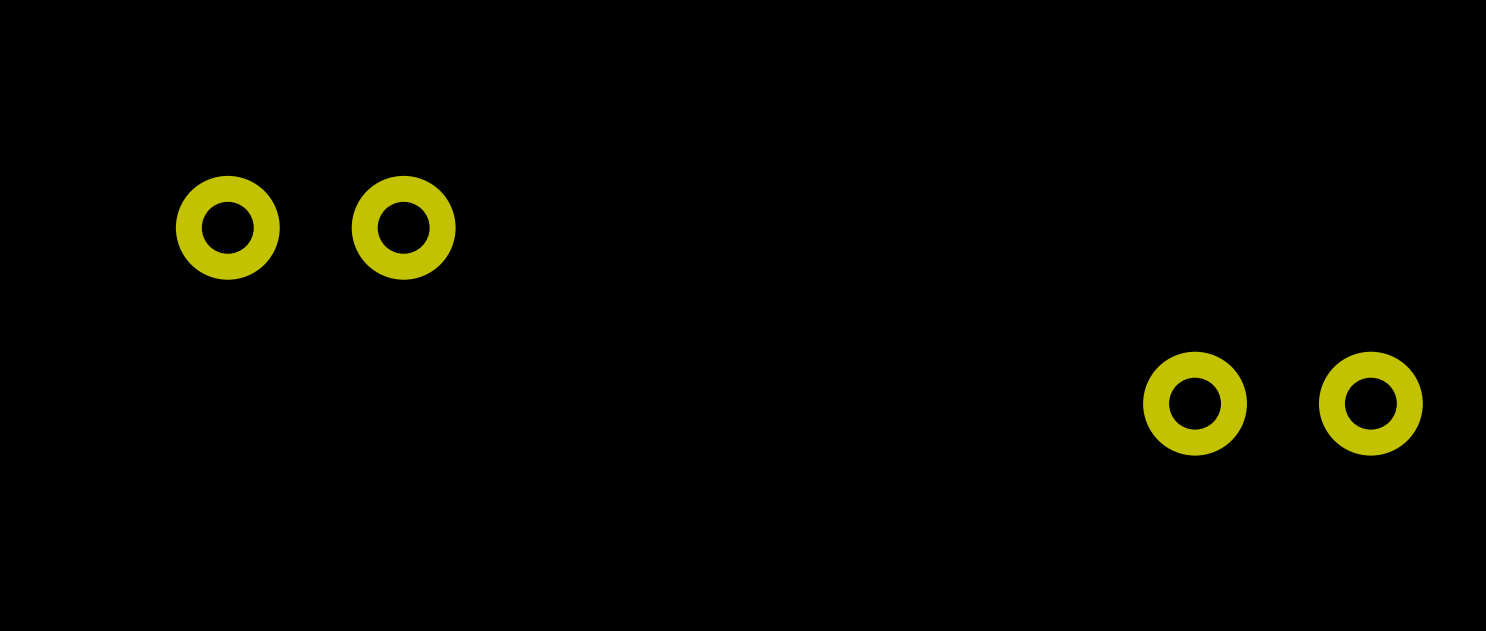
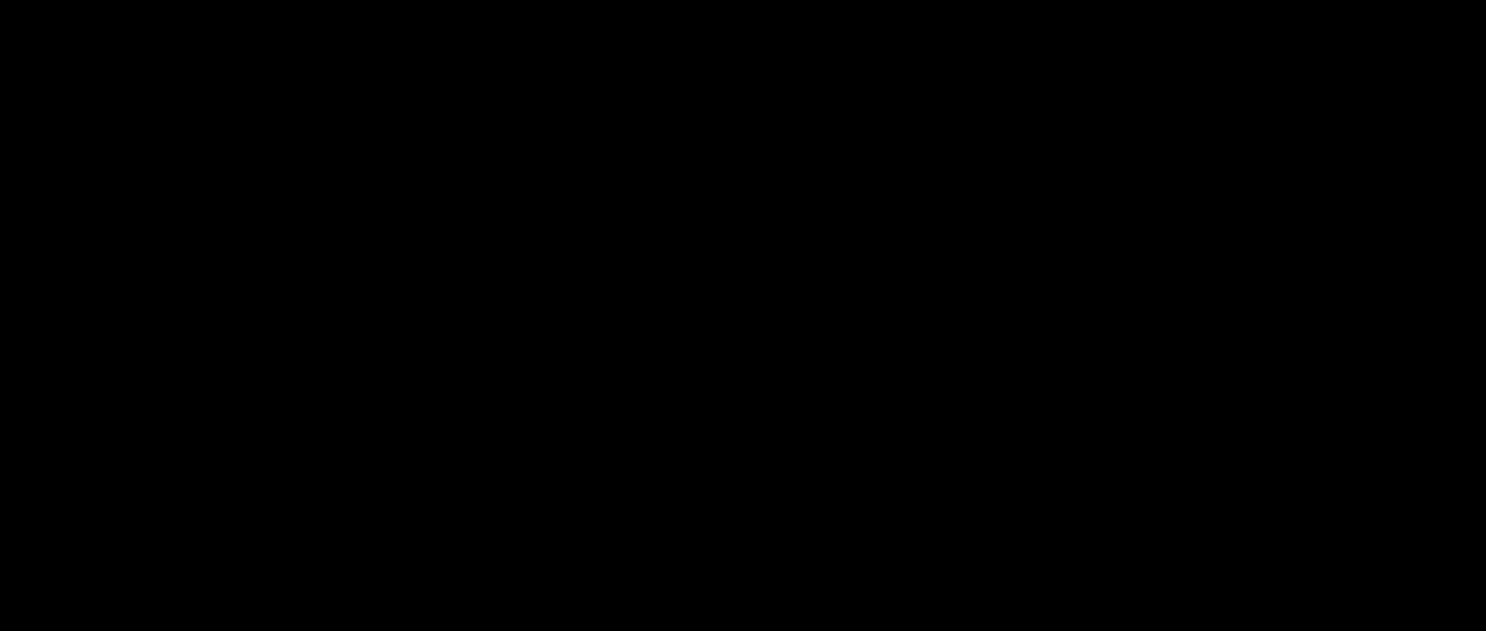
part: (315, 227) -> none
part: (1282, 403) -> none

